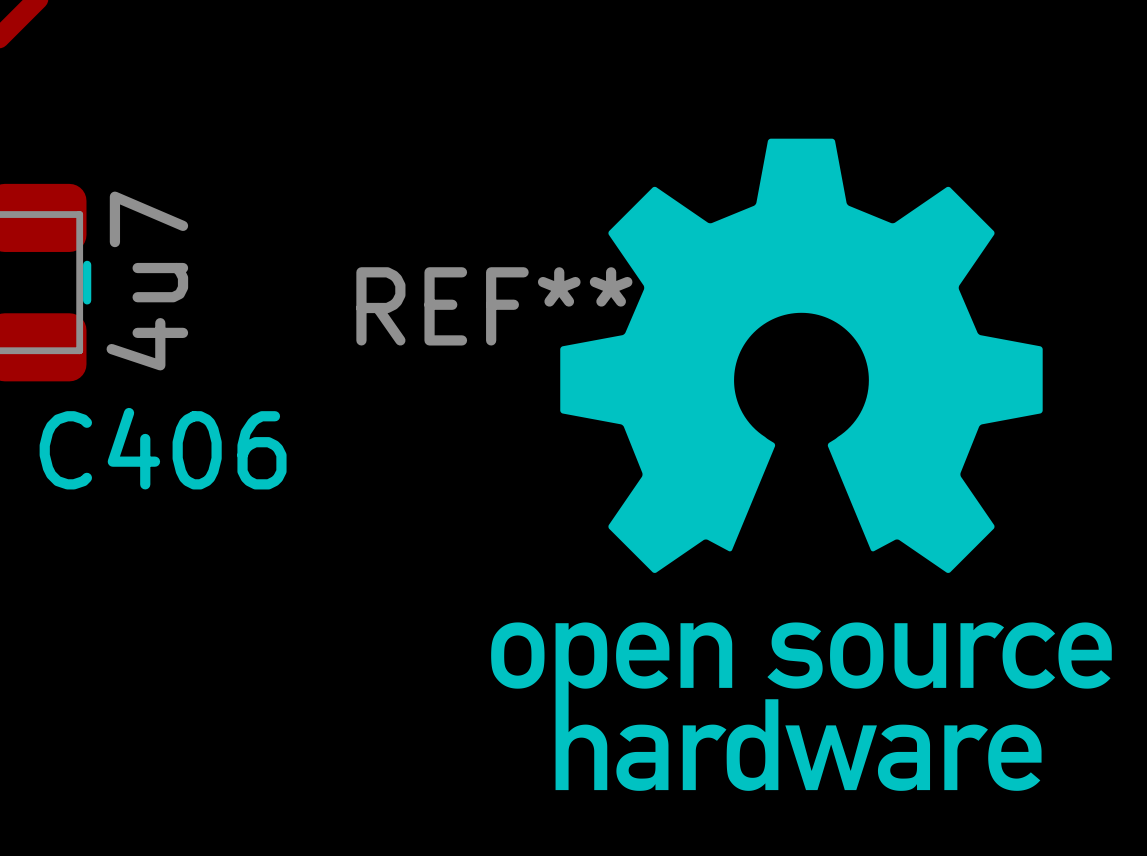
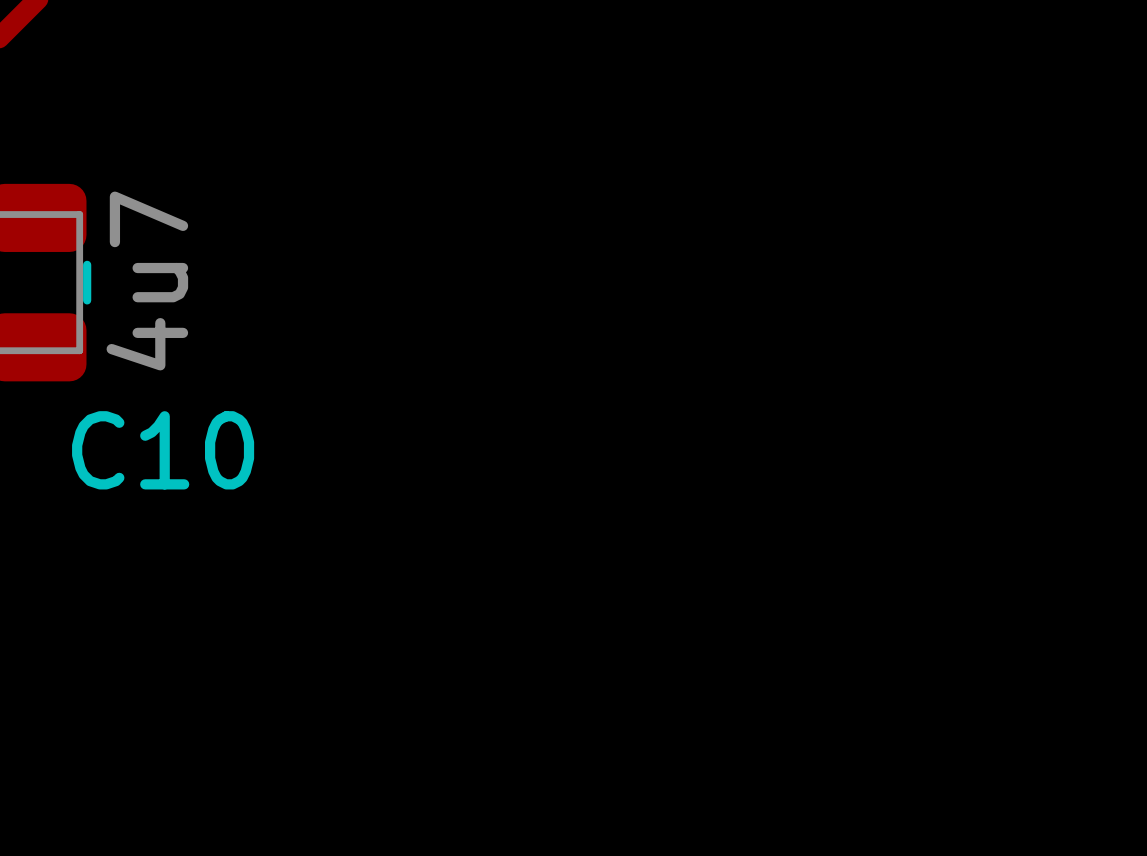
C406 name: C406 (163, 448) -> C10 (163, 450)
REF**: (801, 464) -> none

